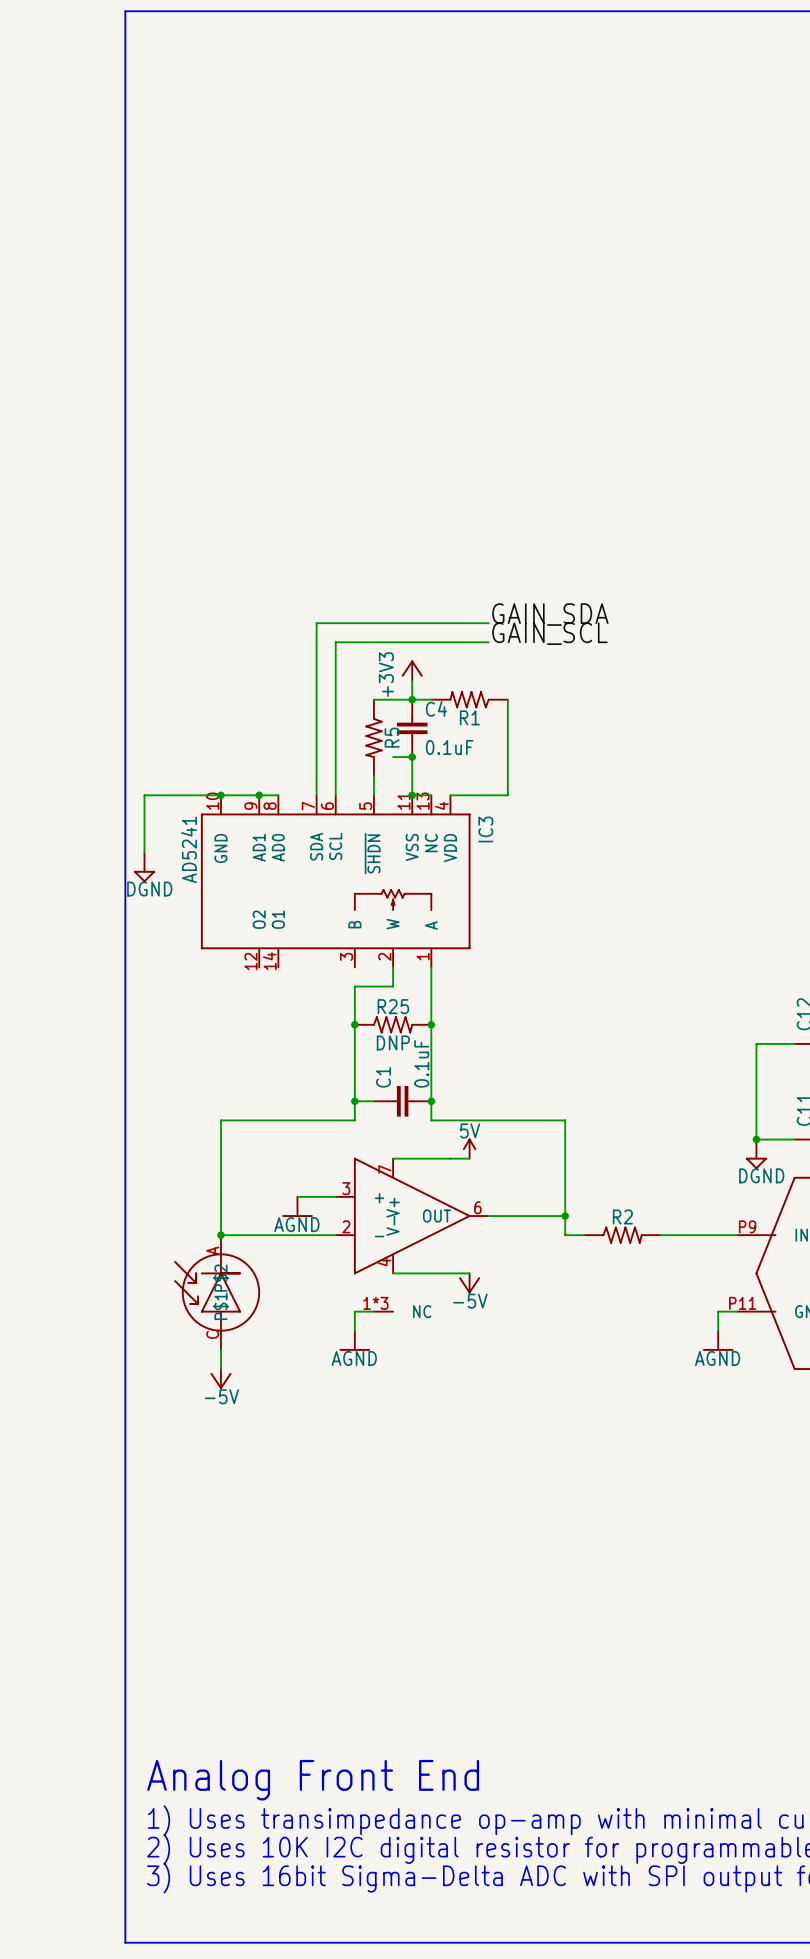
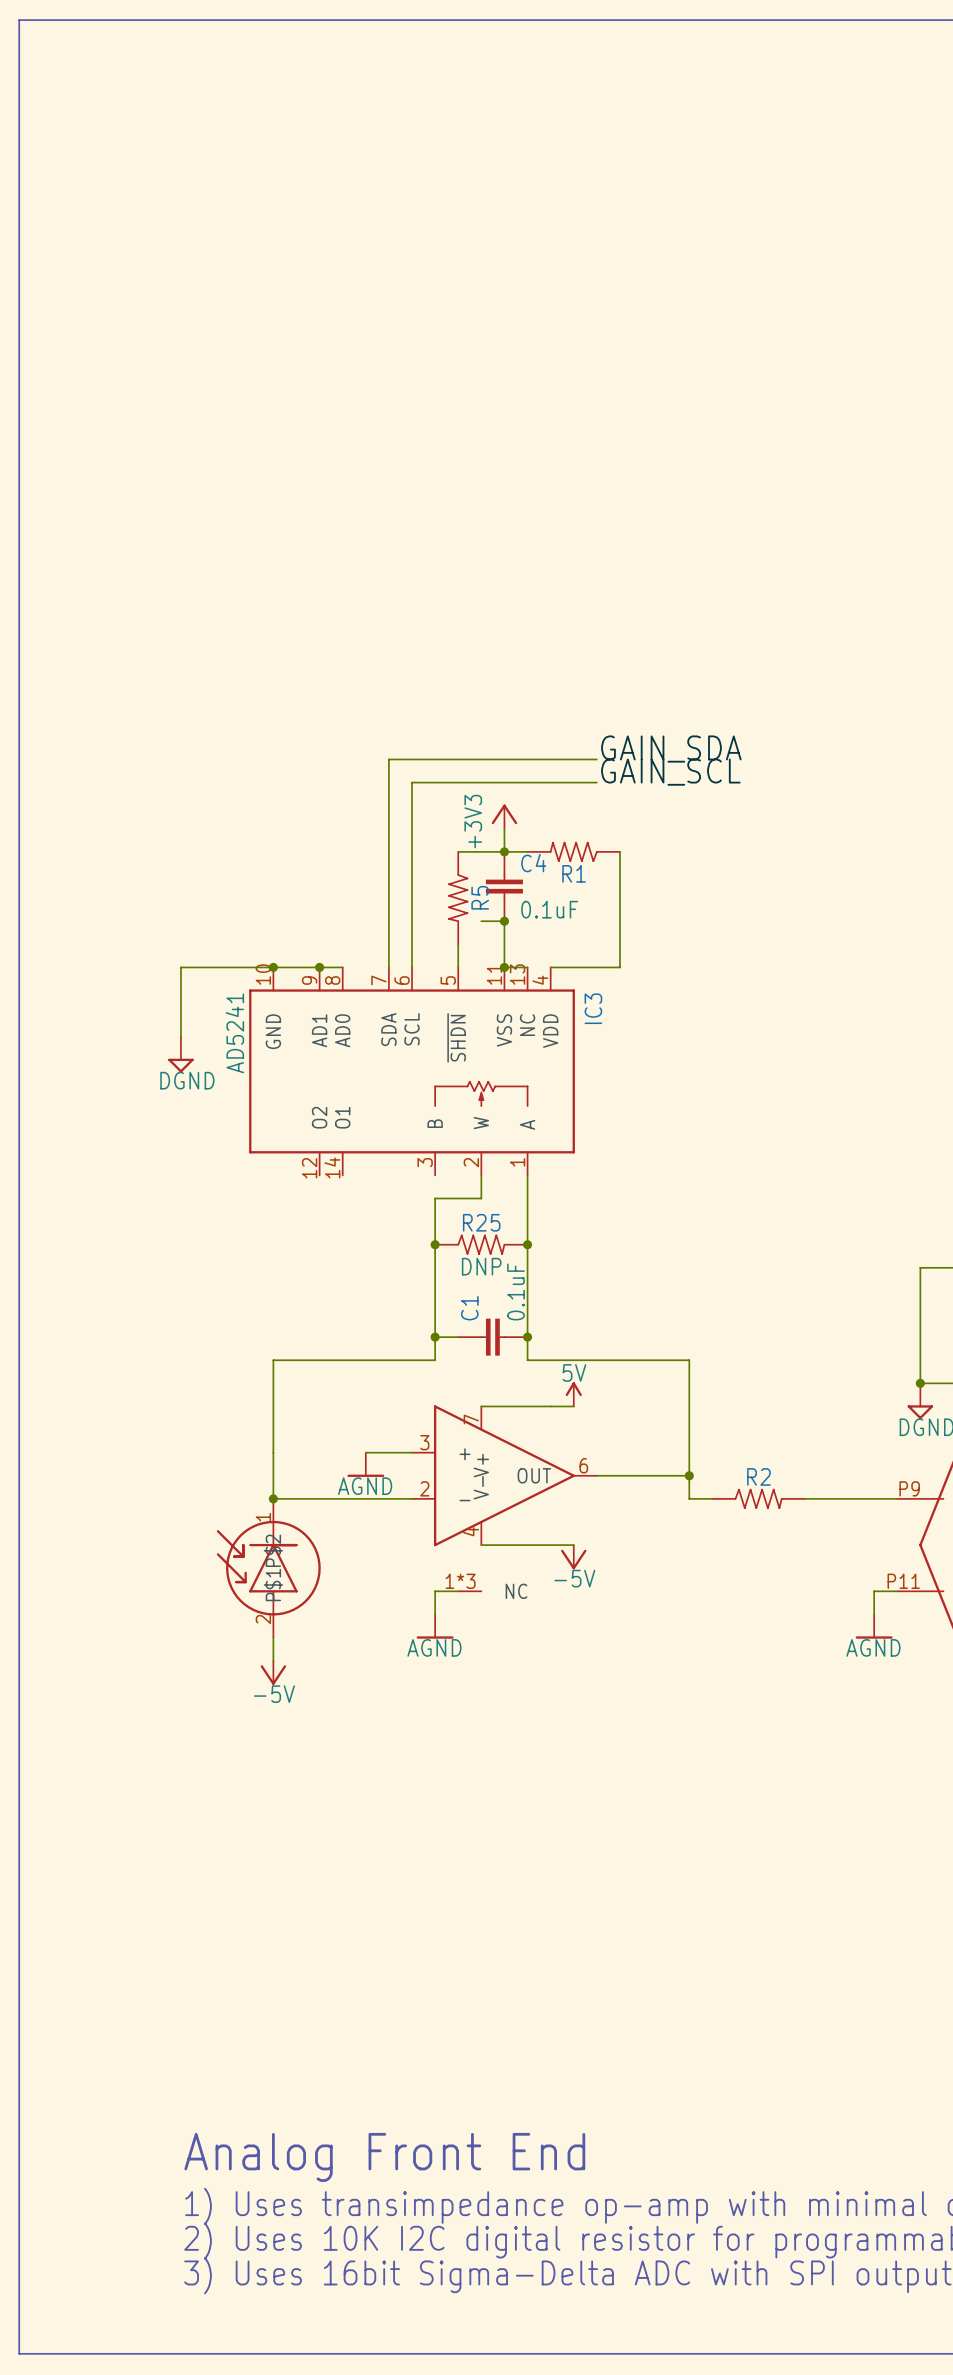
line: (125, 11) (125, 1942) -> (157, 20) (19, 20) (19, 2353) (157, 2353)
part pin number: A (212, 1250) -> 1 (263, 1517)
part pin number: C (212, 1334) -> 2 (263, 1619)

